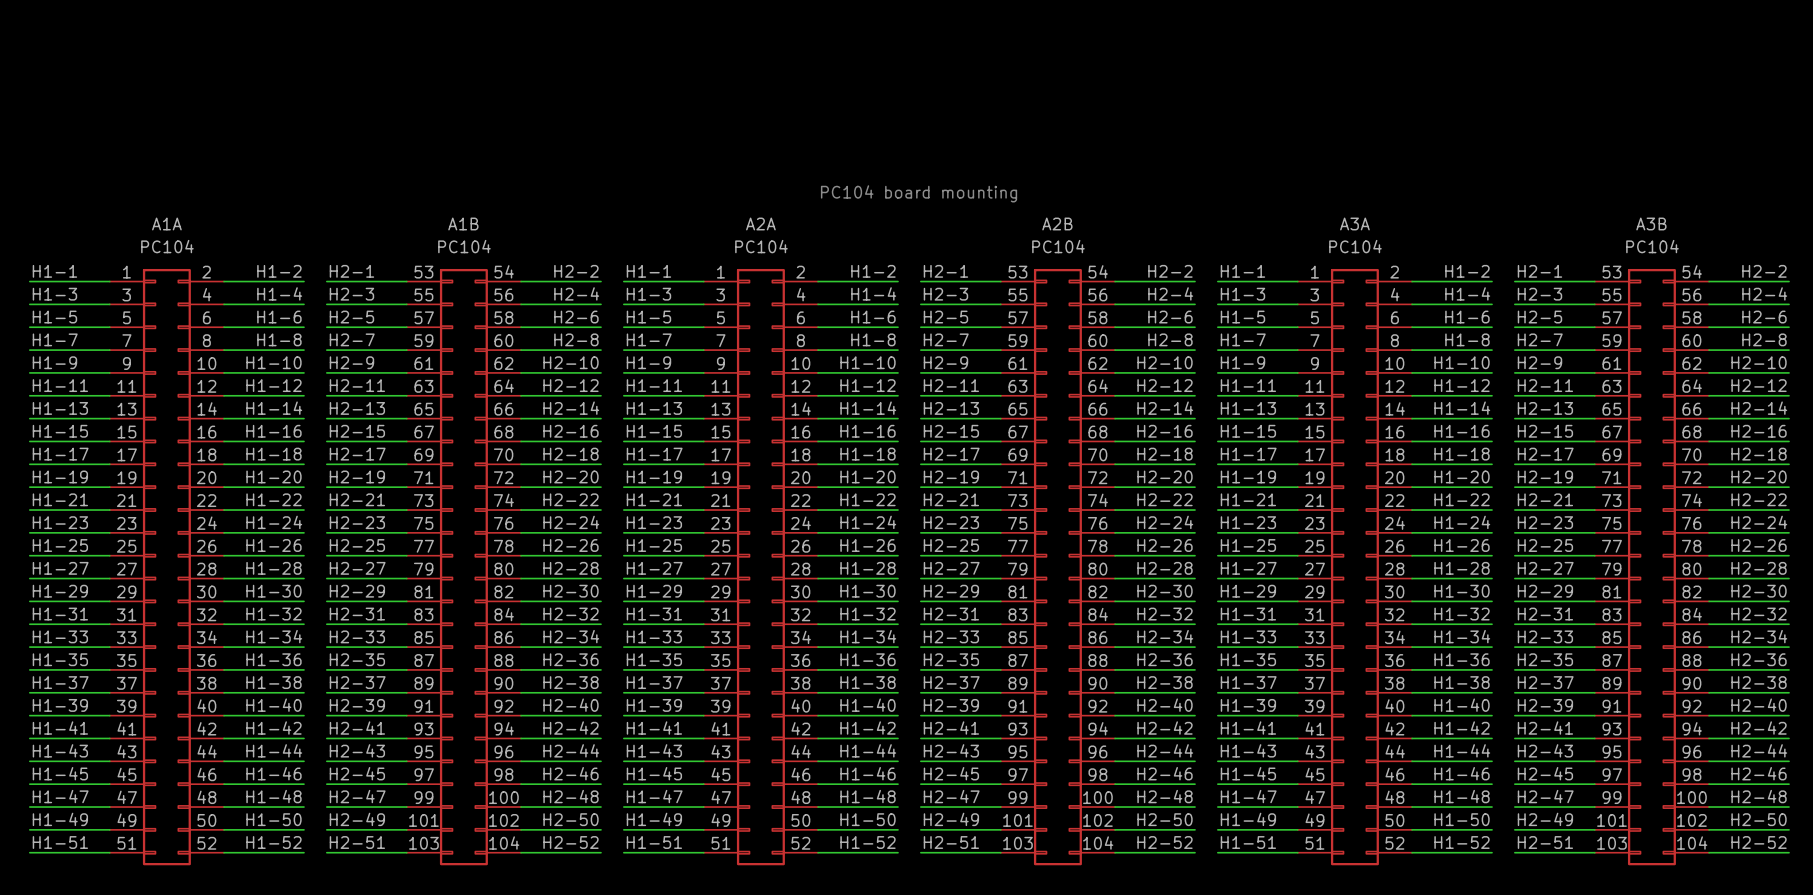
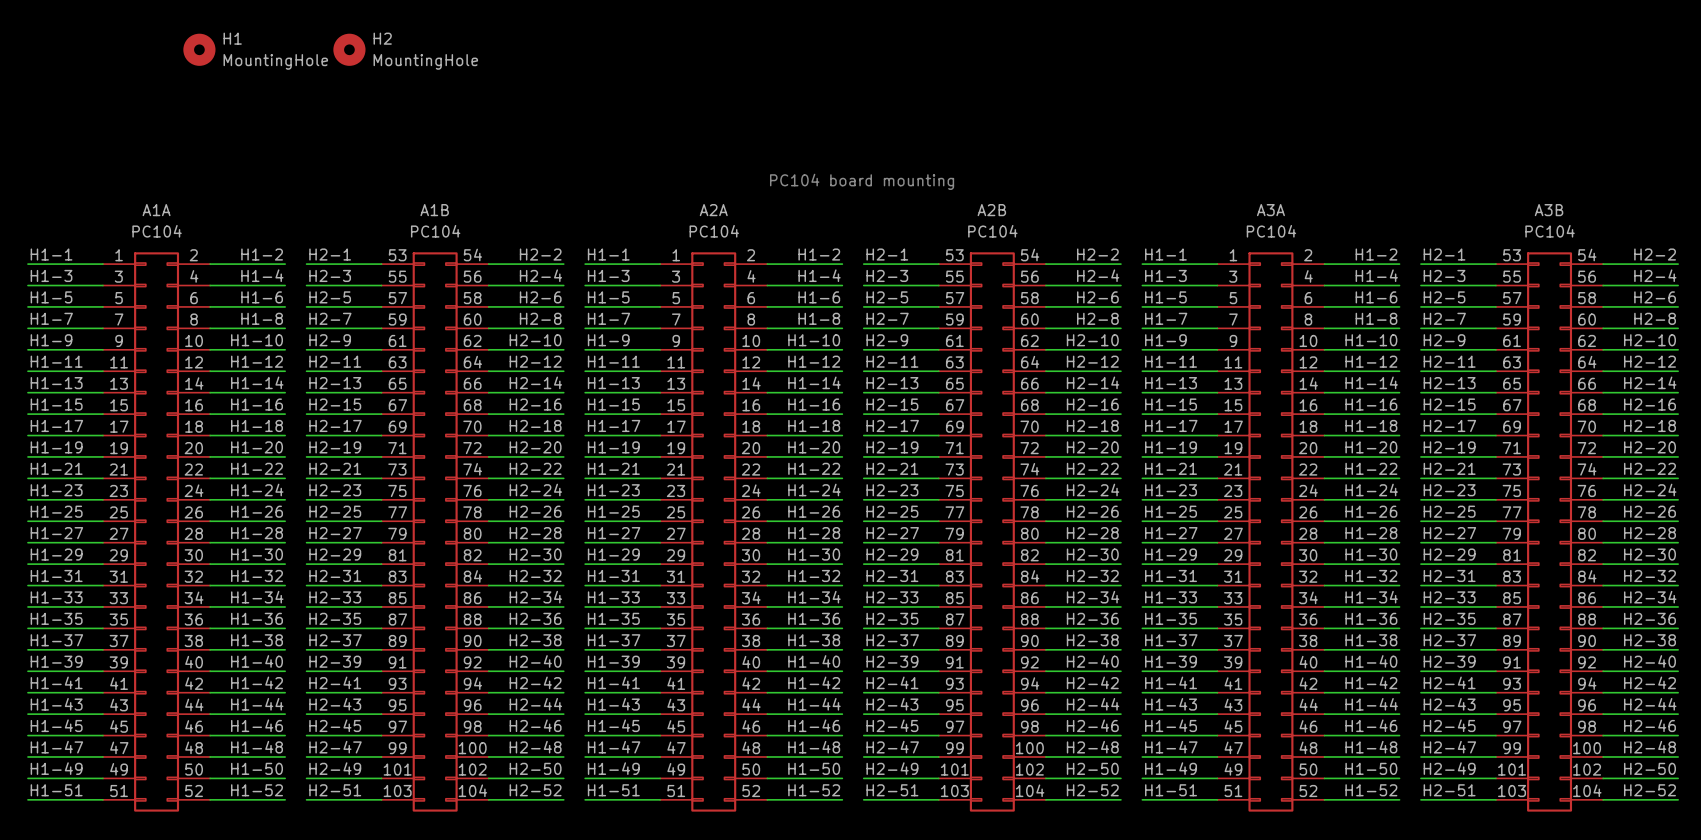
H1: none -> MountingHole (199, 49)
H2: none -> MountingHole (349, 49)

